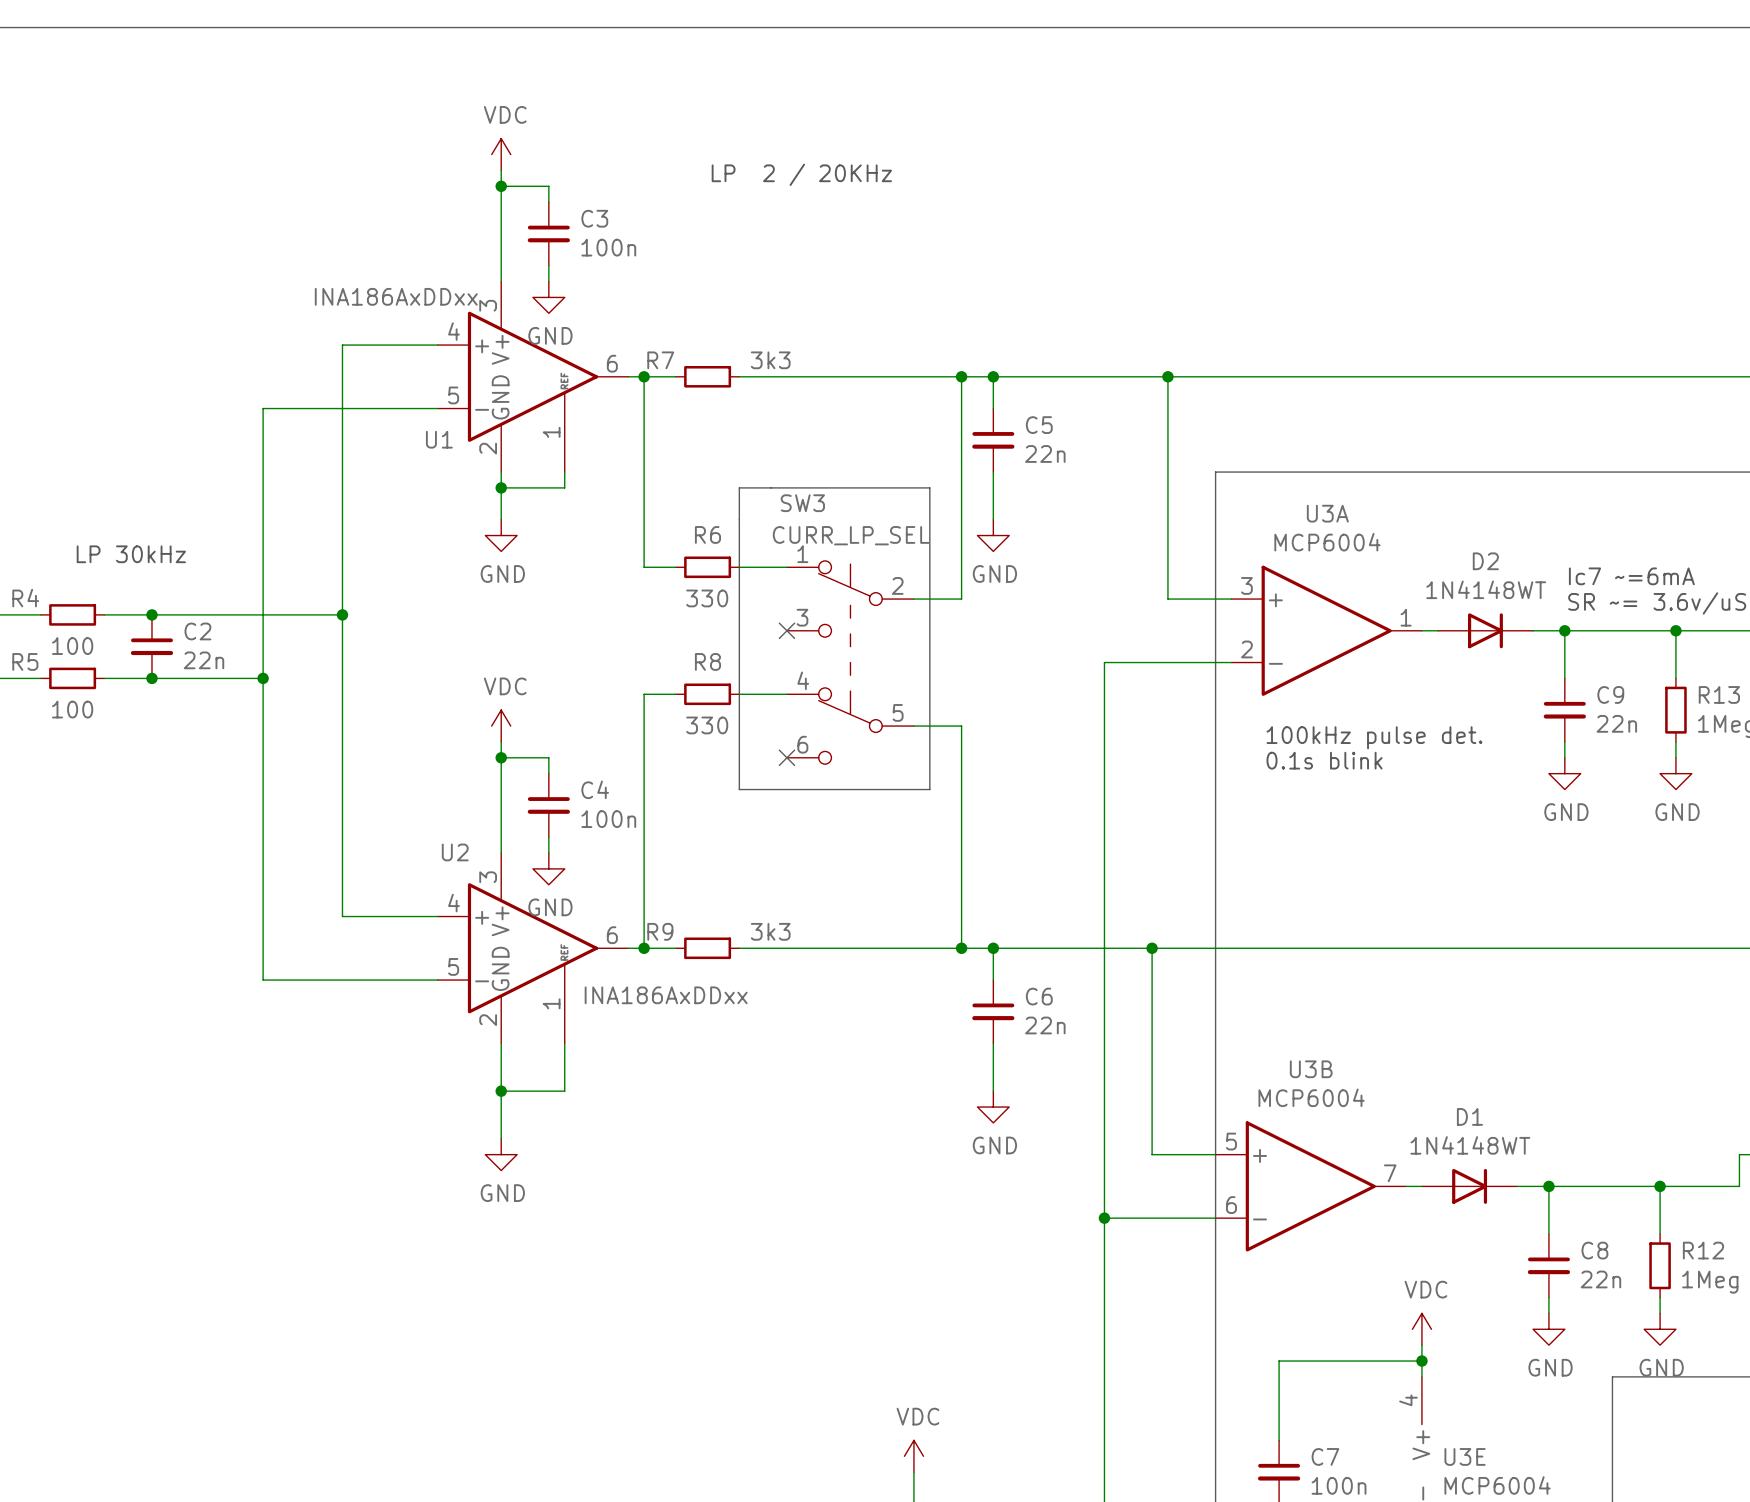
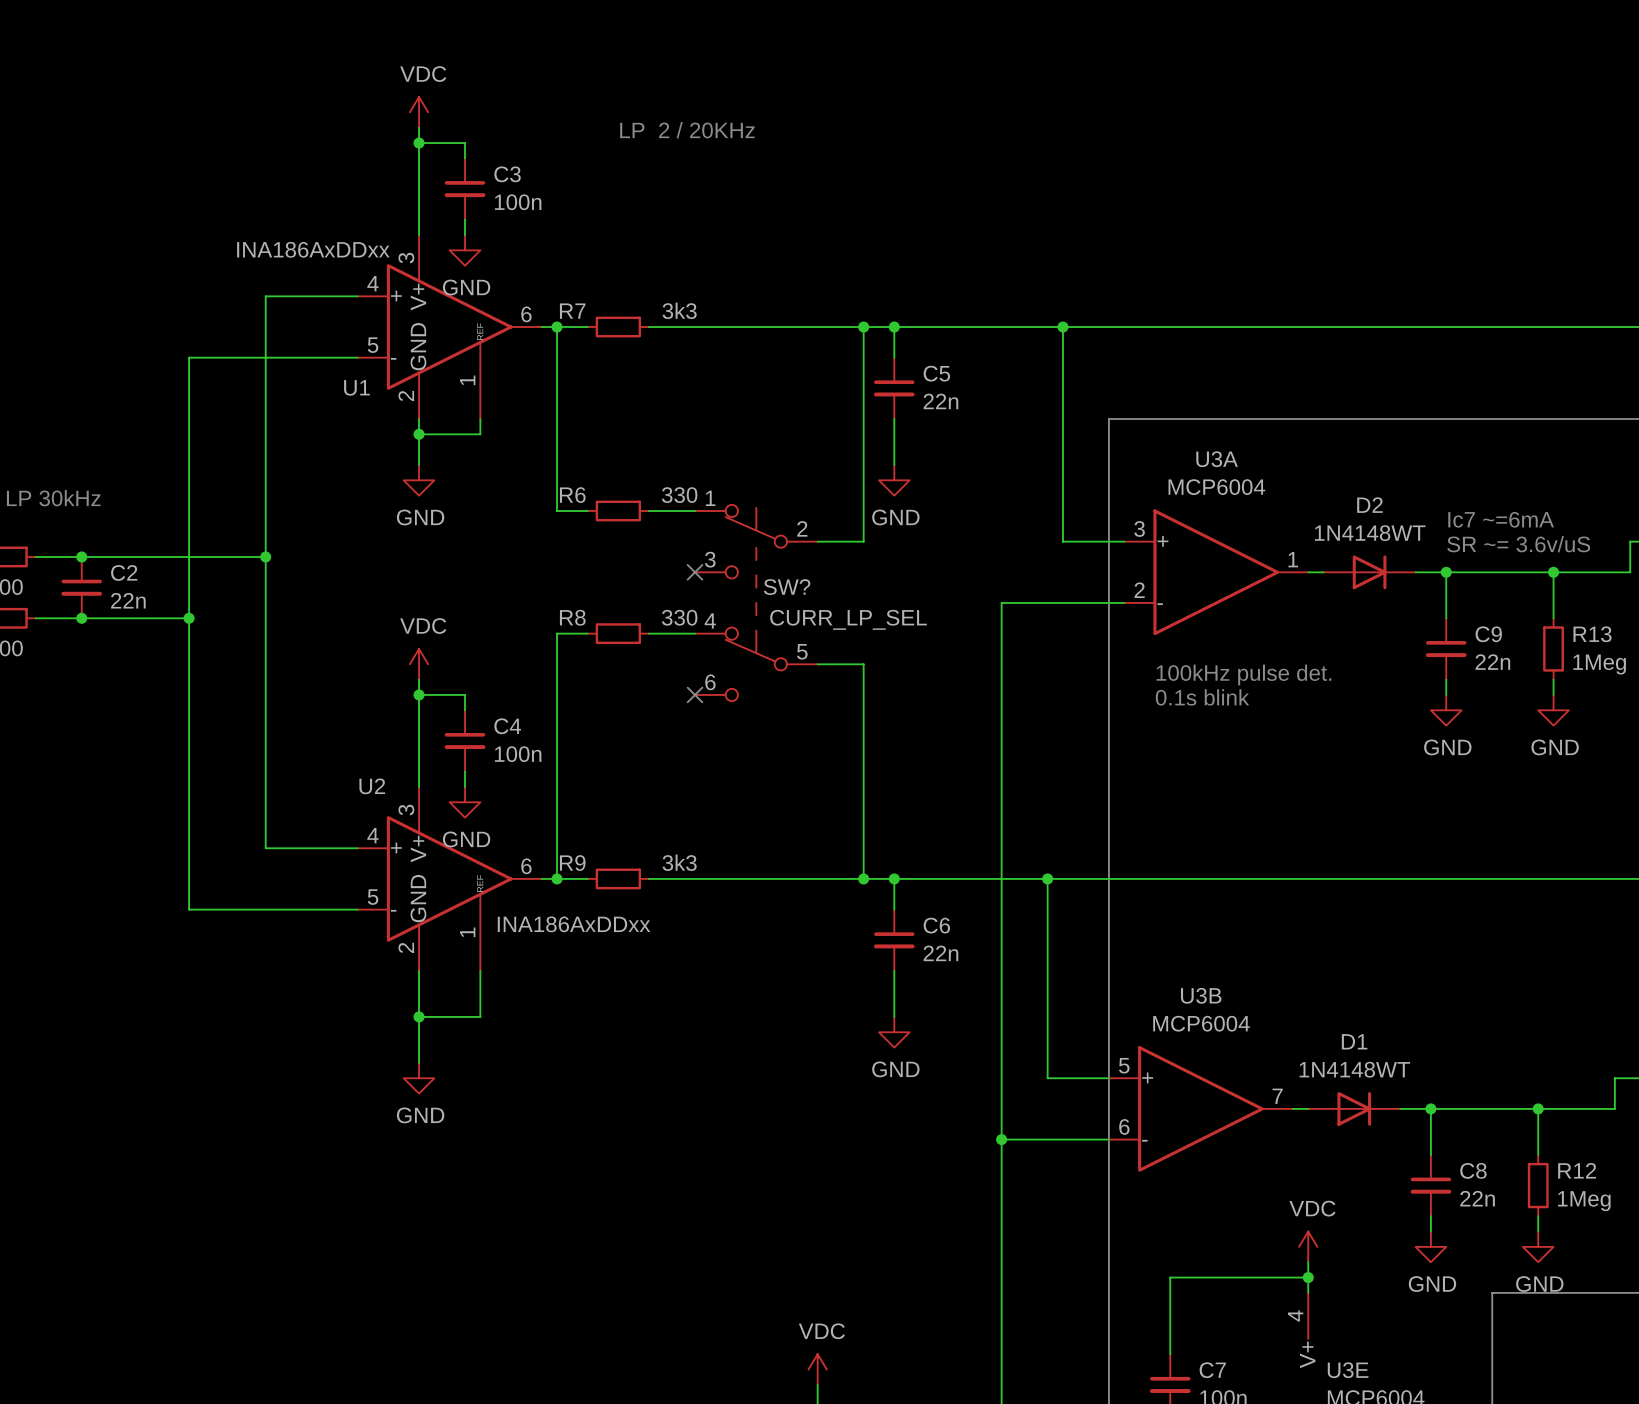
line: (739, 487) (739, 789) (929, 789) (929, 487) (739, 487) -> none
SW3 name: SW3 (802, 503) -> SW? (787, 587)
R6 name position: R6 (707, 534) -> R6 (572, 495)
SW3 value position: CURR_LP_SEL (851, 535) -> CURR_LP_SEL (848, 619)
R6 value position: 330 (707, 598) -> 330 (679, 495)
R8 name position: R8 (707, 661) -> R8 (572, 617)
R8 value position: 330 (707, 725) -> 330 (679, 617)

